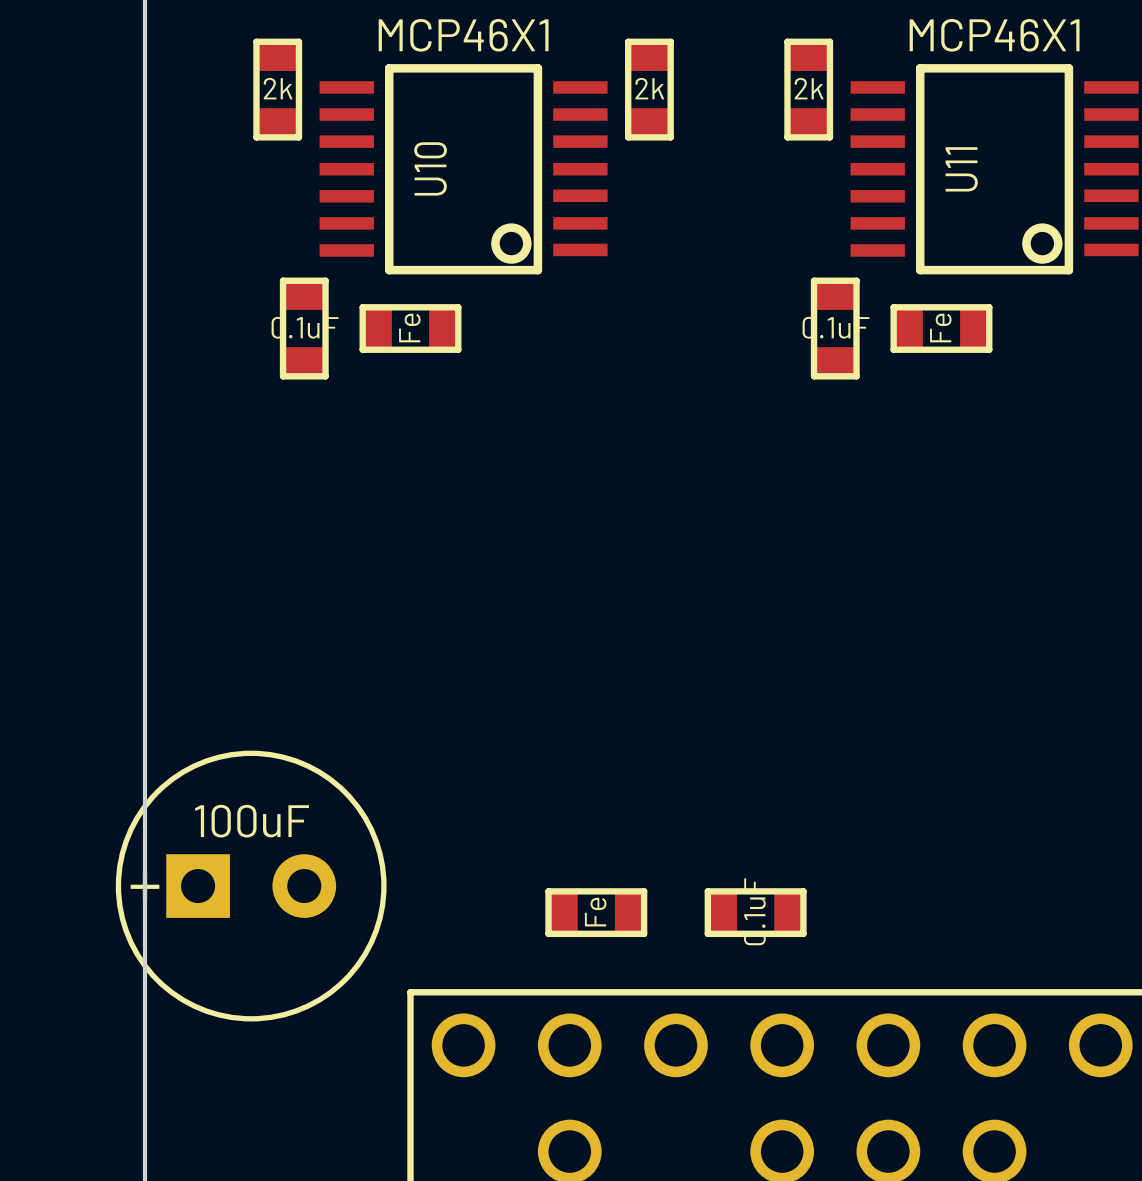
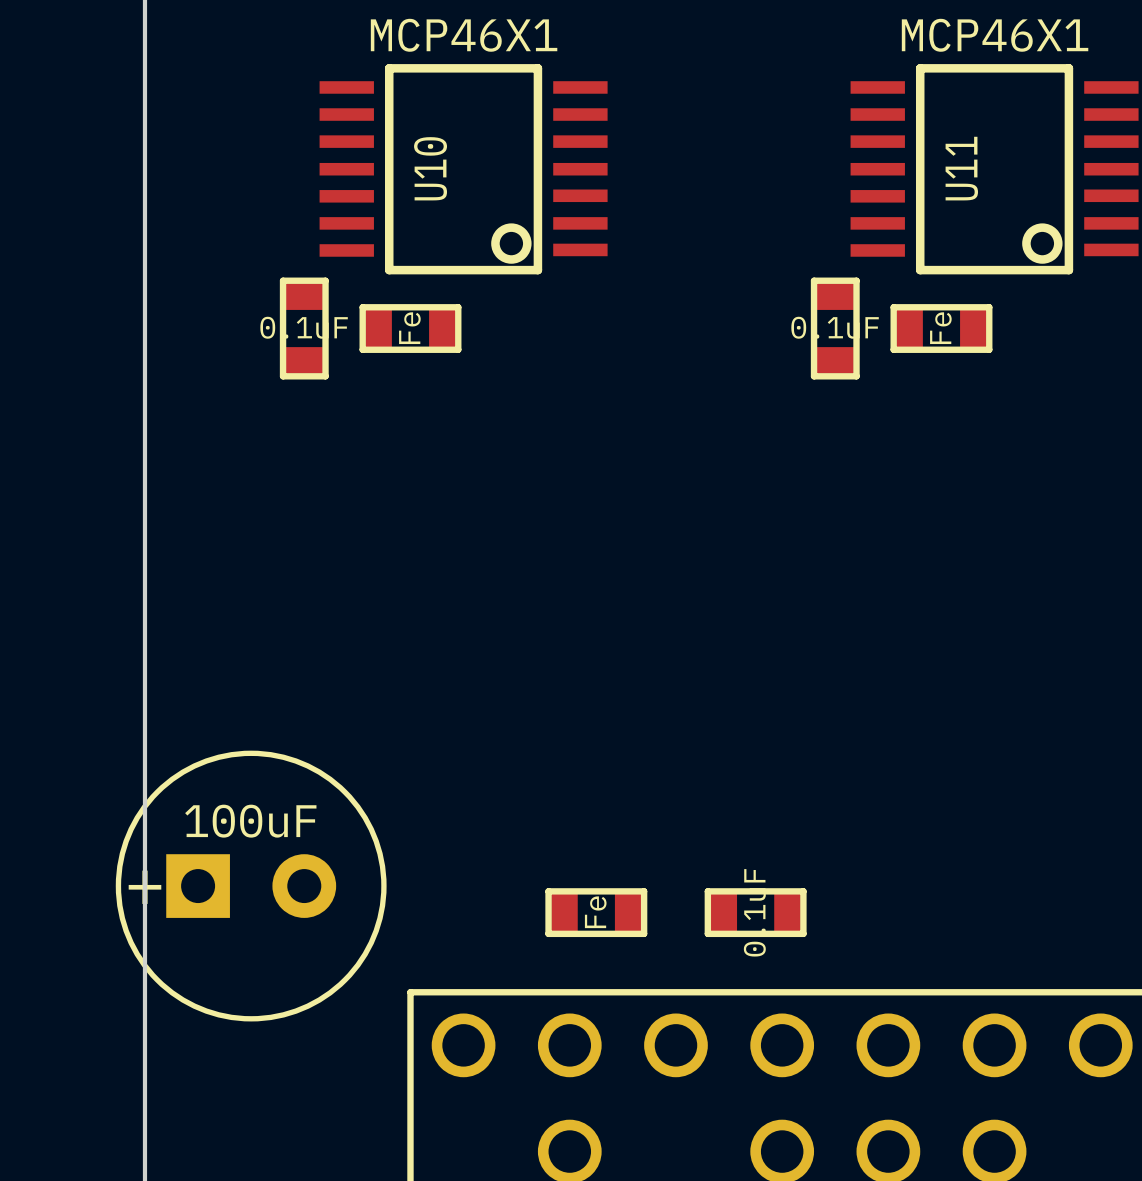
part: 2k (277, 89) -> none
part: 2k (649, 89) -> none
part: 2k (808, 89) -> none

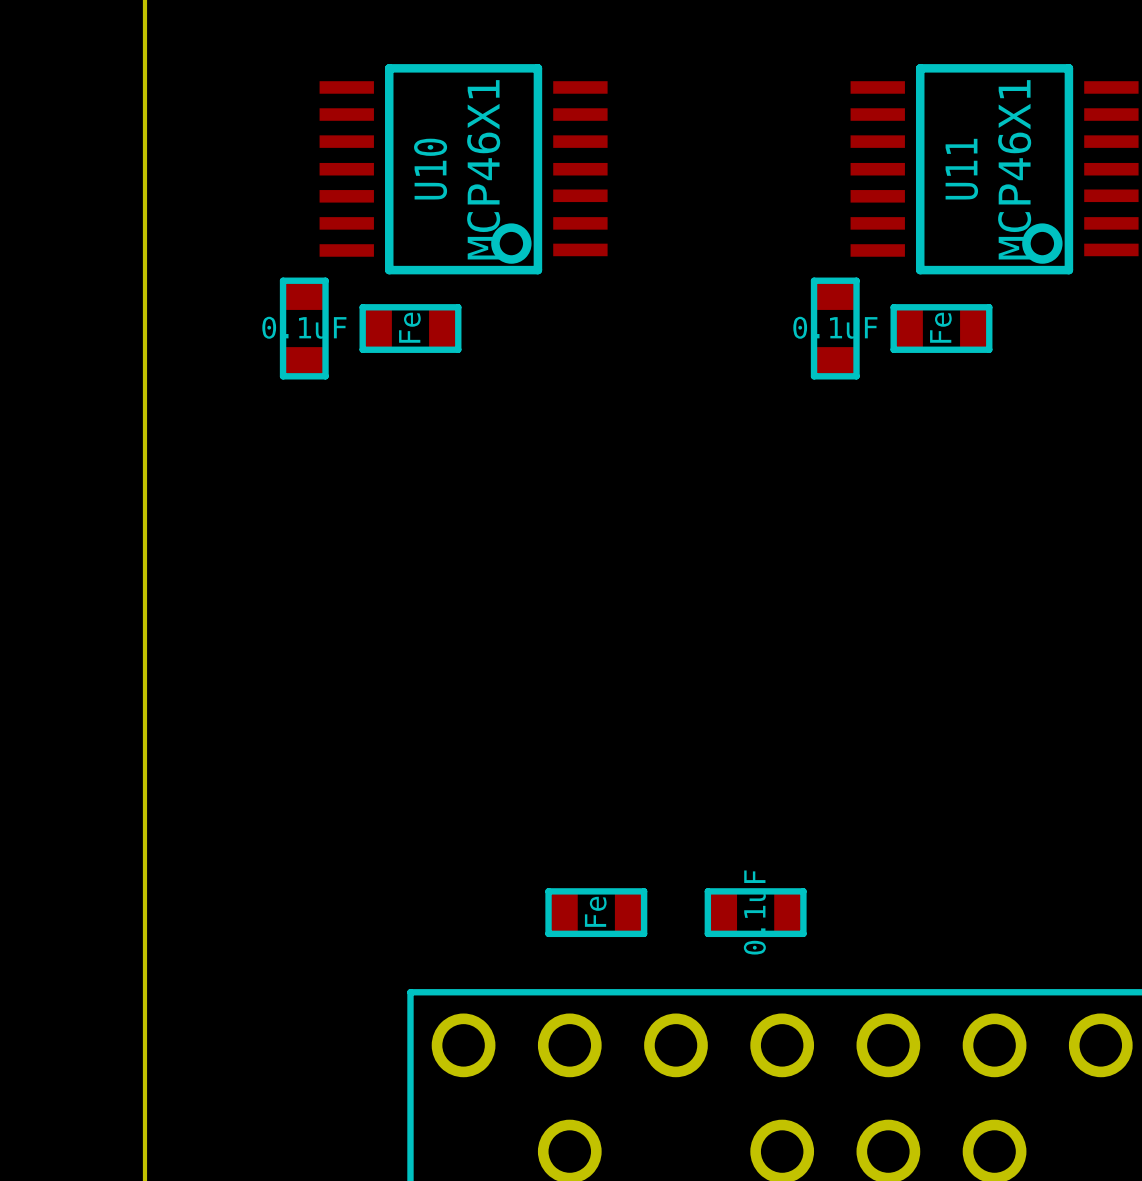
U10 value rotation: 0° (464, 35) -> 90° counterclockwise (483, 169)
U11 value rotation: 0° (995, 35) -> 90° counterclockwise (1014, 169)
part: 100uF (251, 886) -> none

